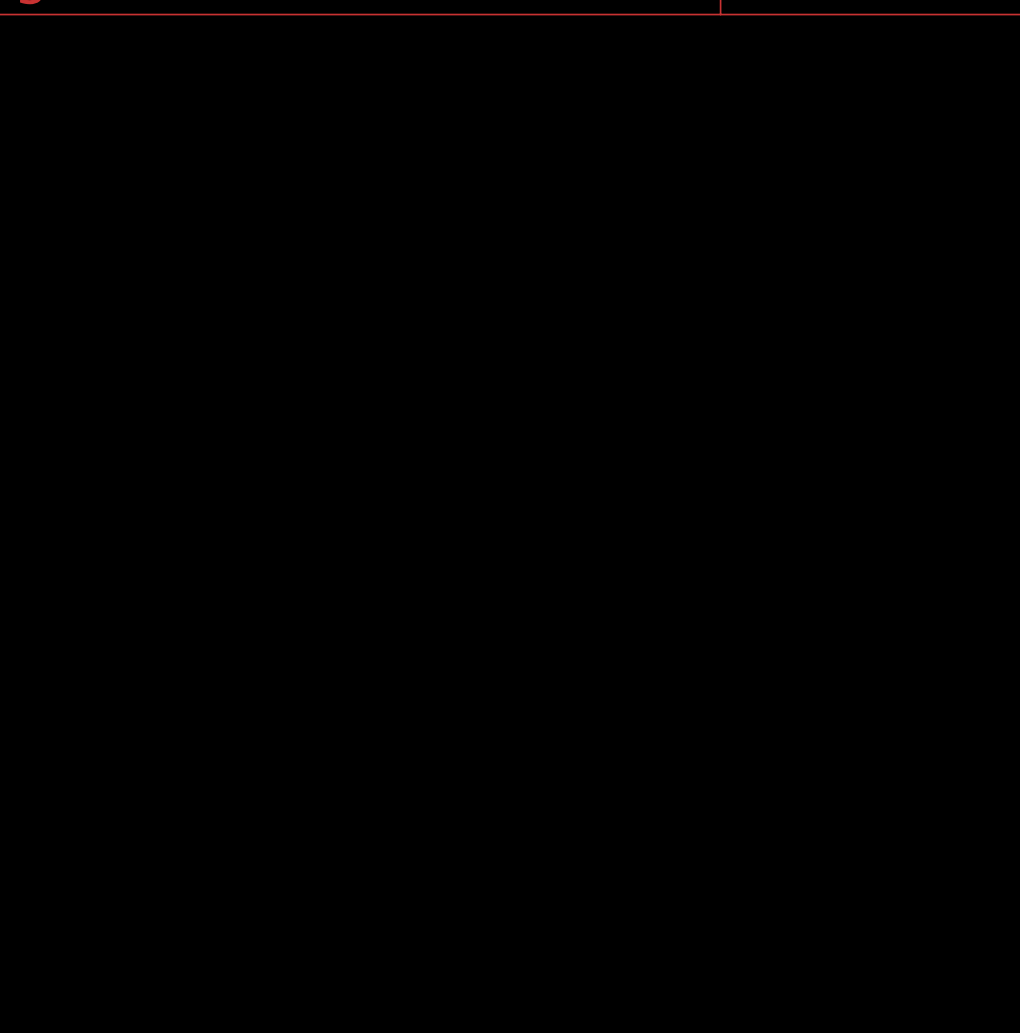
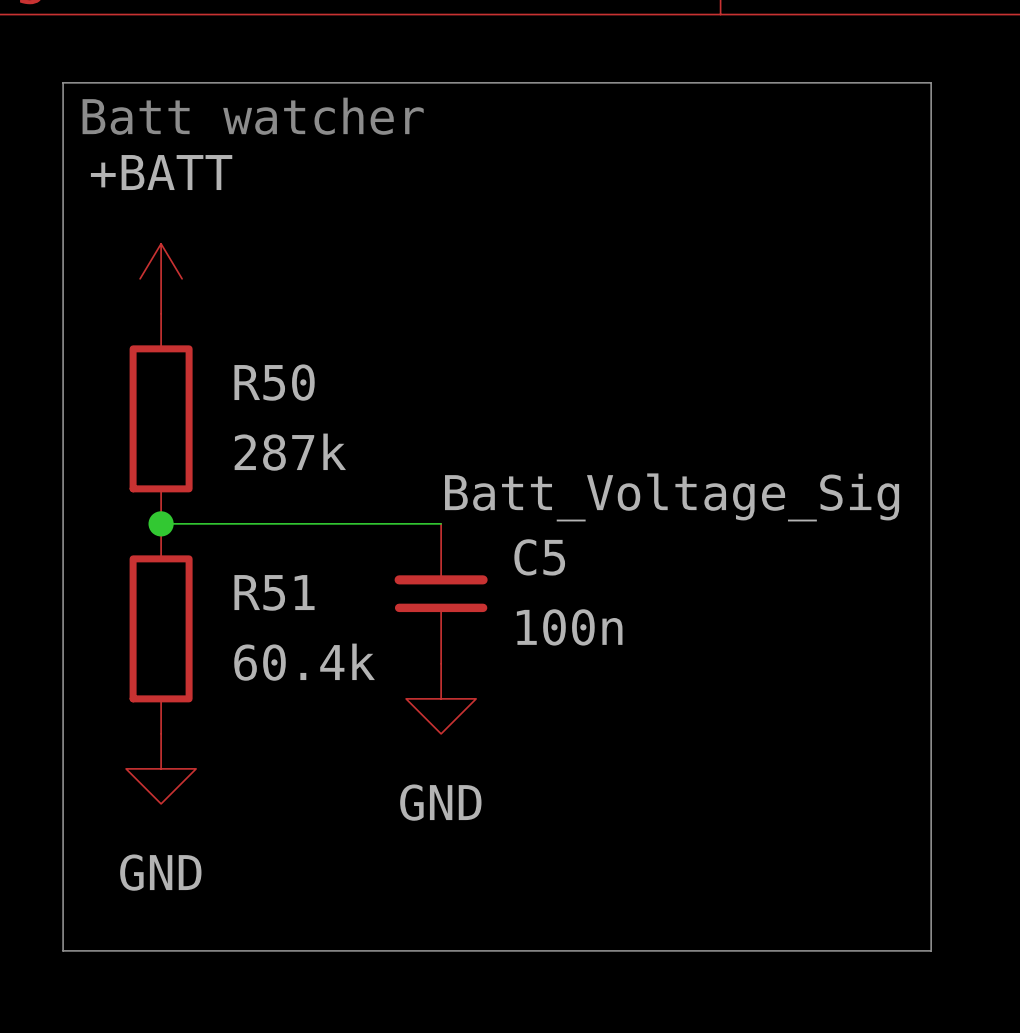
line: none -> (63, 82) (931, 82) (931, 950) (63, 950) (63, 82)
text: none -> Batt watcher (253, 116)
power symbol: none -> +BATT (161, 278)
R50: none -> 287k (161, 418)
label: none -> Batt_Voltage_Sig (672, 497)
wire: none -> (161, 523) (441, 523)
junction: none -> (161, 523)
C5: none -> 100n (441, 593)
R51: none -> 60.4k (161, 628)
power symbol: none -> GND (441, 698)
power symbol: none -> GND (161, 768)

